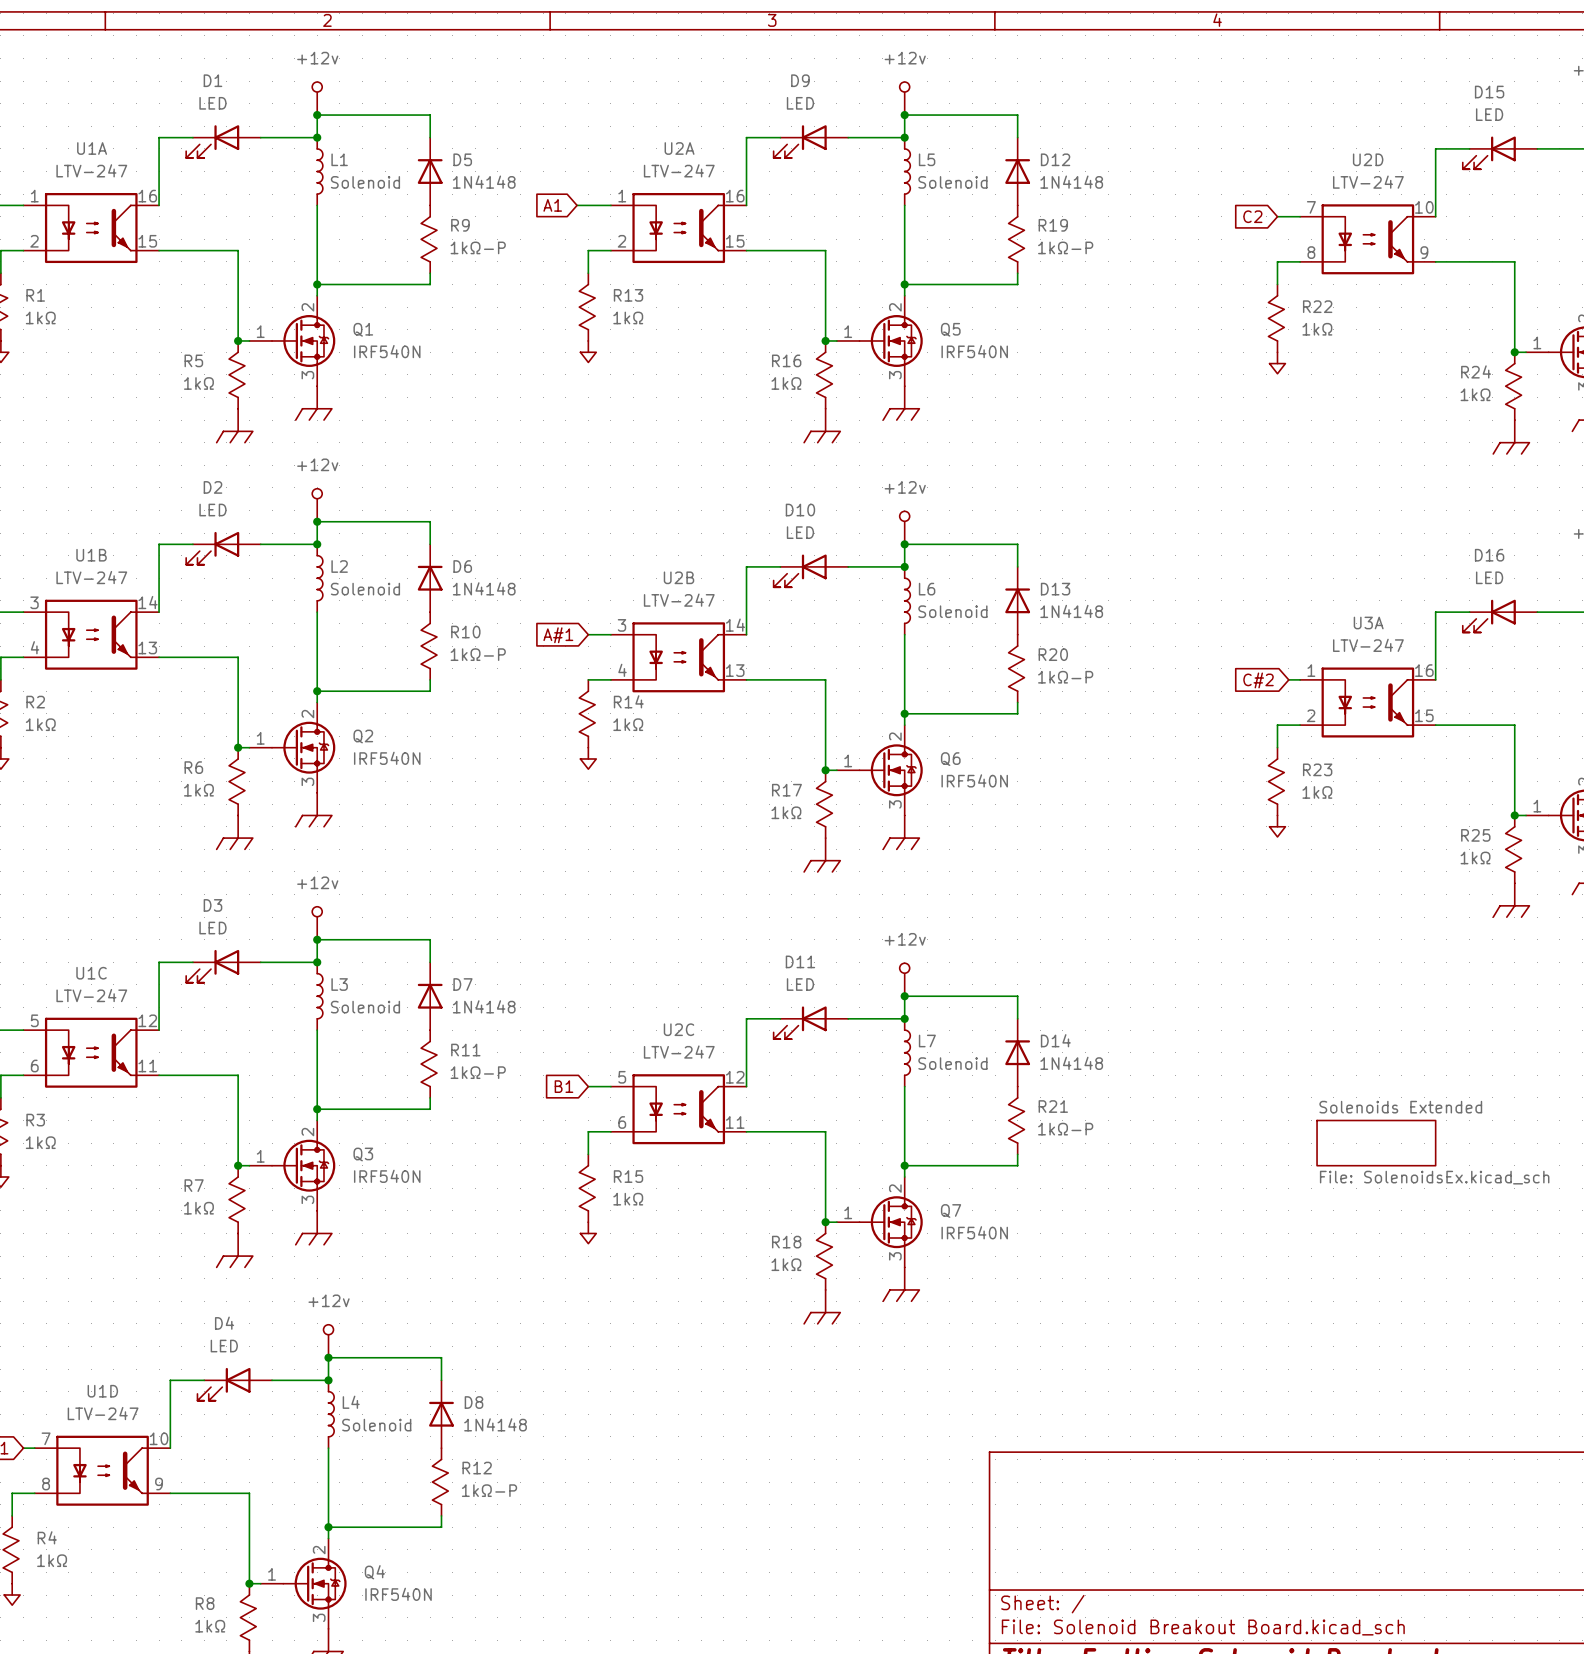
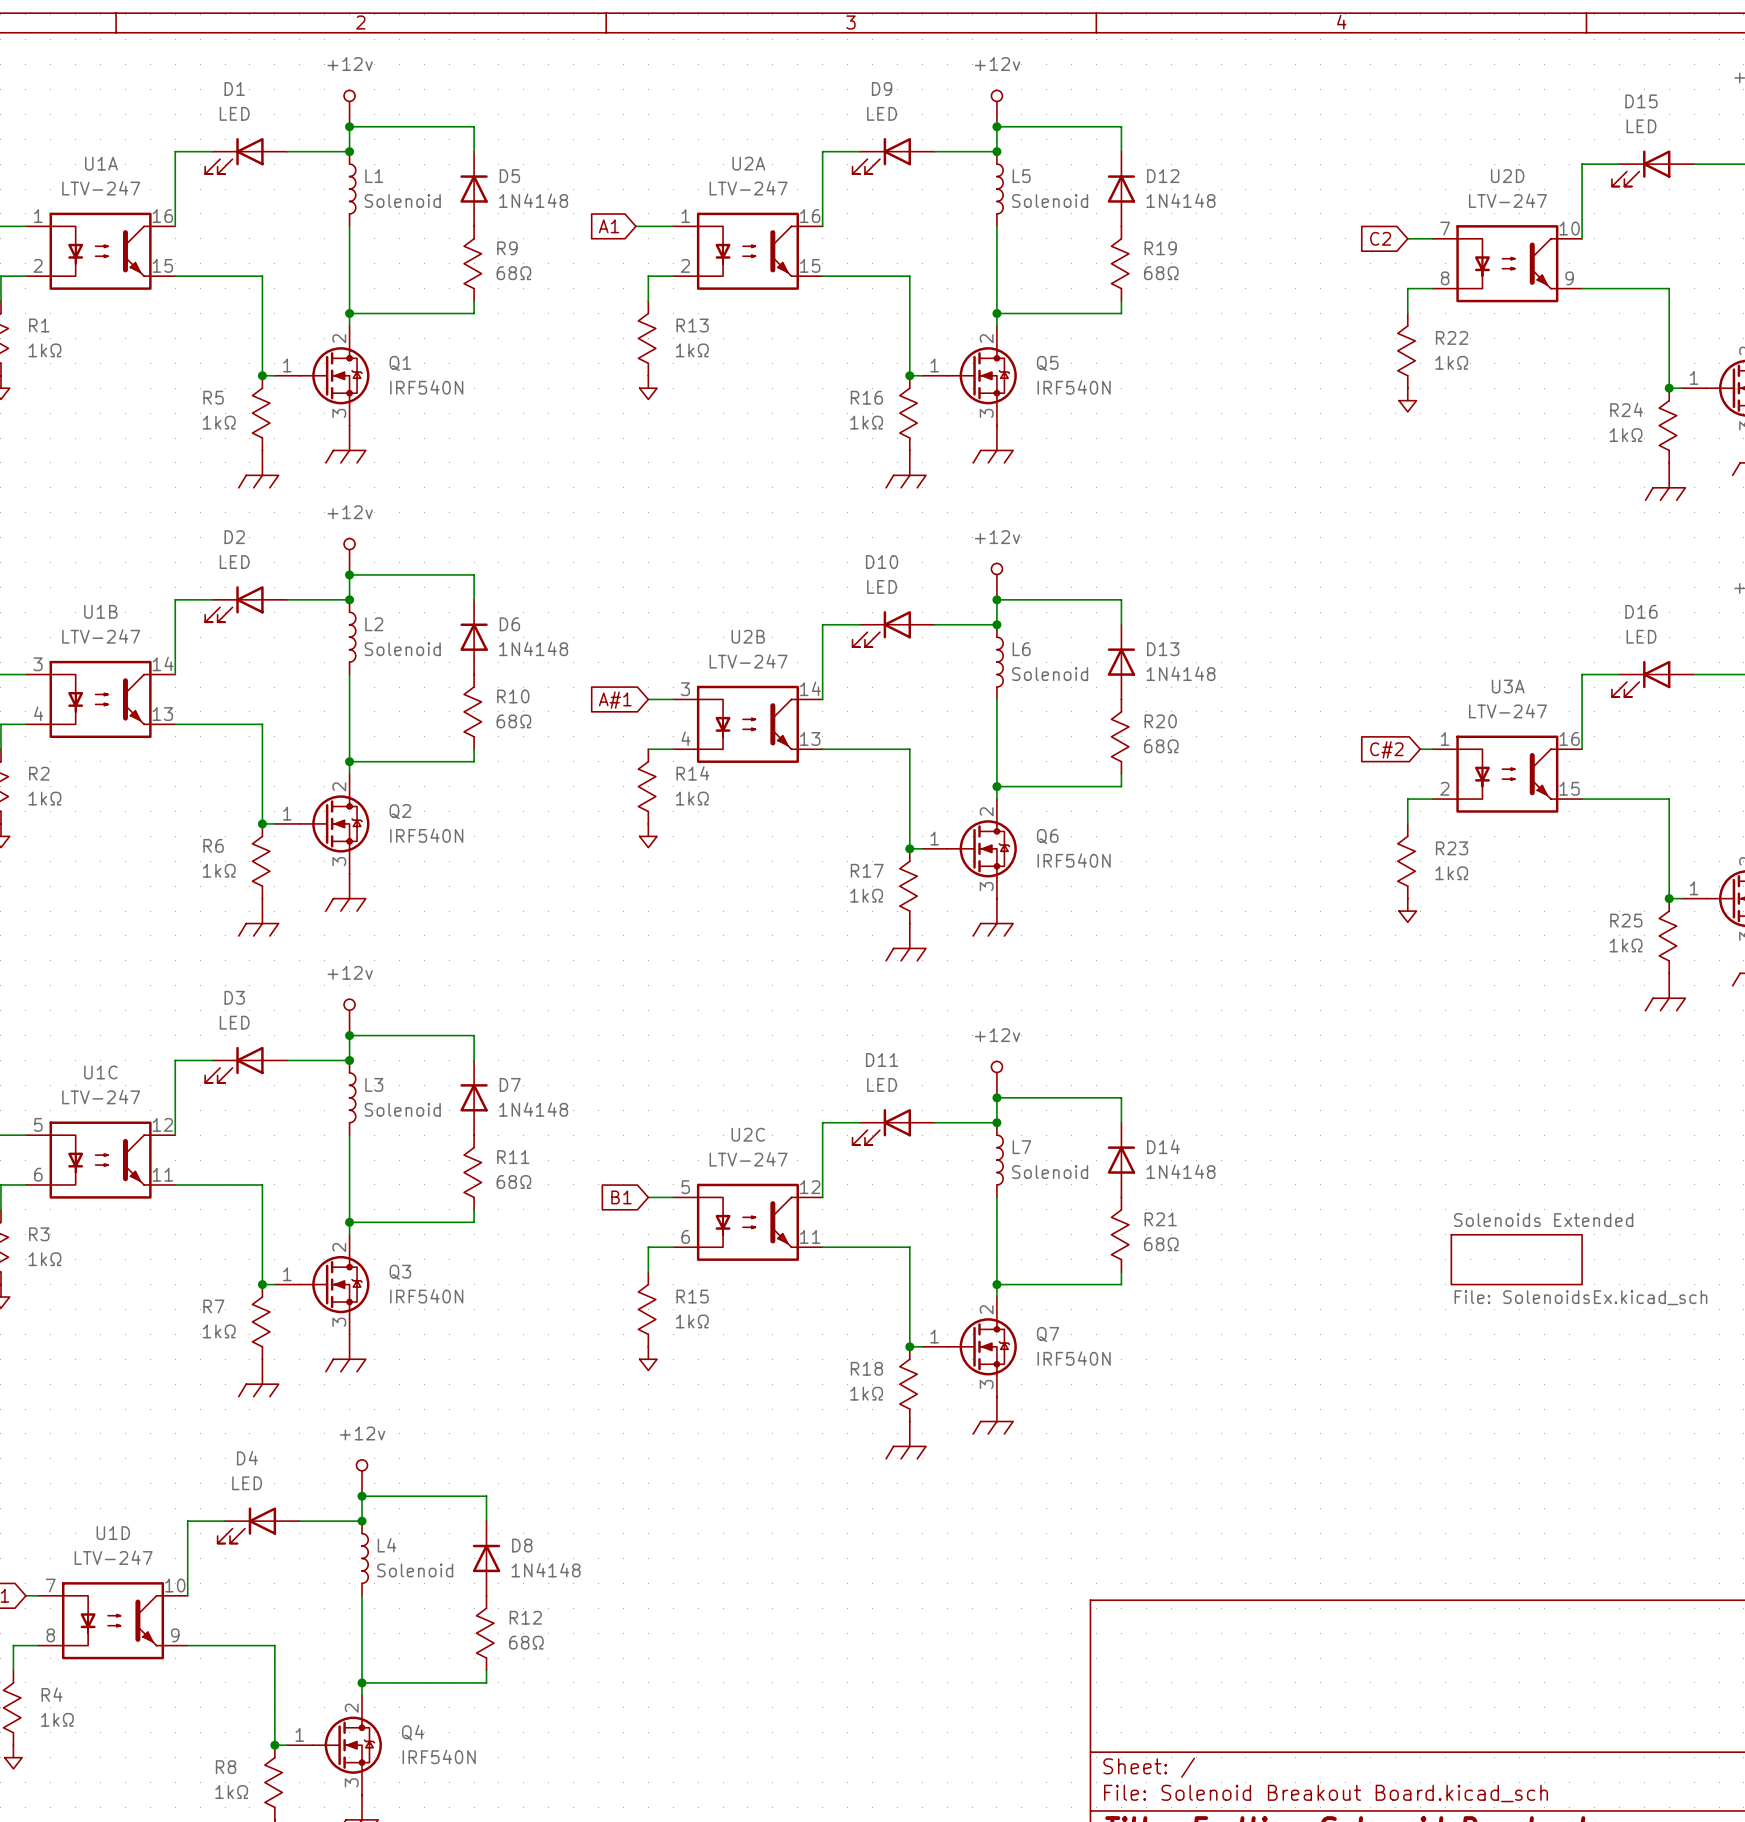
R9 value: 1kΩ-P (478, 247) -> 68Ω (513, 273)
R19 value: 1kΩ-P (1065, 247) -> 68Ω (1161, 273)
R10 value: 1kΩ-P (478, 654) -> 68Ω (513, 721)
R20 value: 1kΩ-P (1065, 677) -> 68Ω (1161, 746)
R11 value: 1kΩ-P (478, 1072) -> 68Ω (513, 1182)
R21 value: 1kΩ-P (1065, 1129) -> 68Ω (1161, 1244)
R12 value: 1kΩ-P (489, 1490) -> 68Ω (526, 1642)

